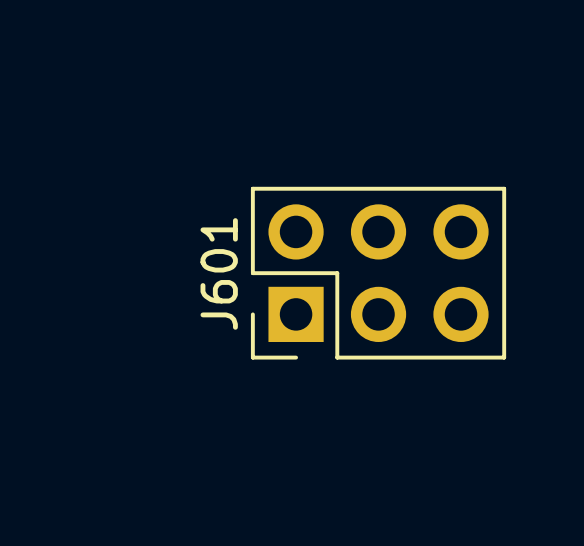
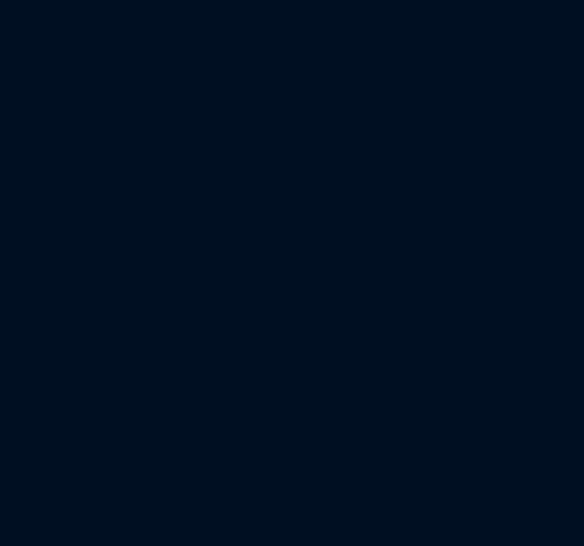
J601: (378, 273) -> none

